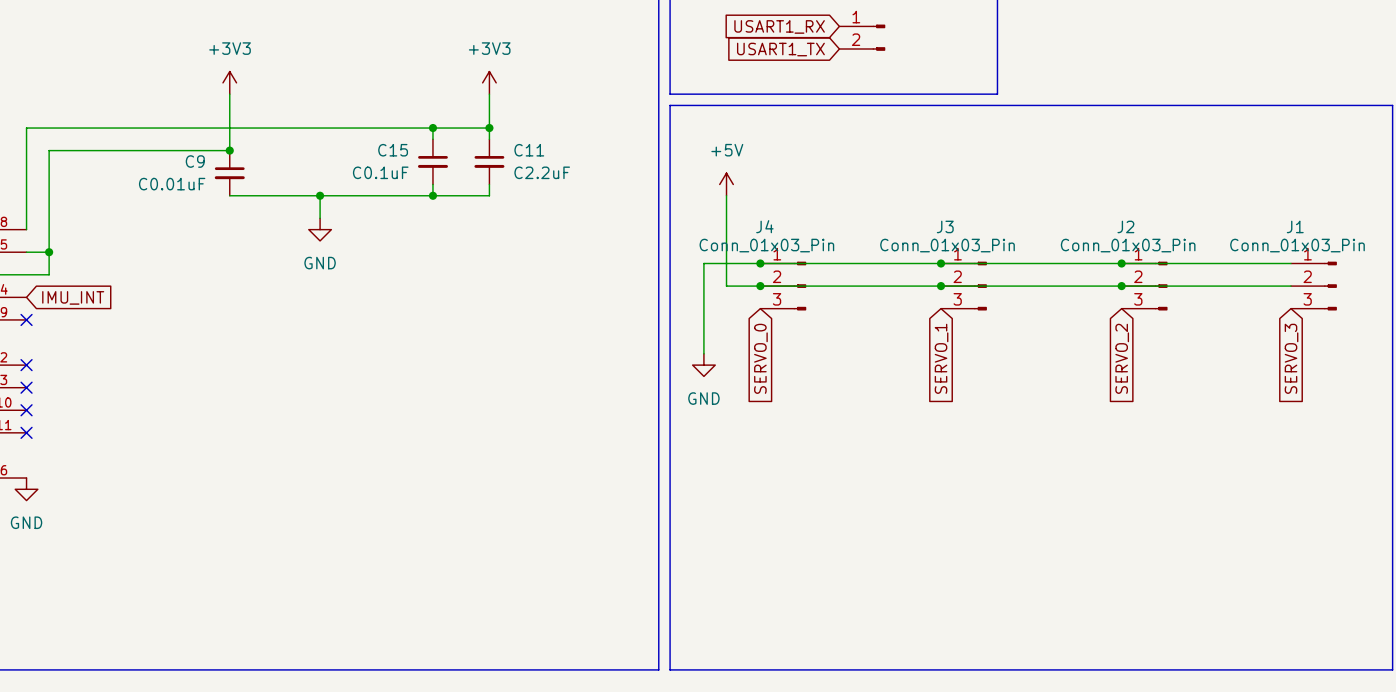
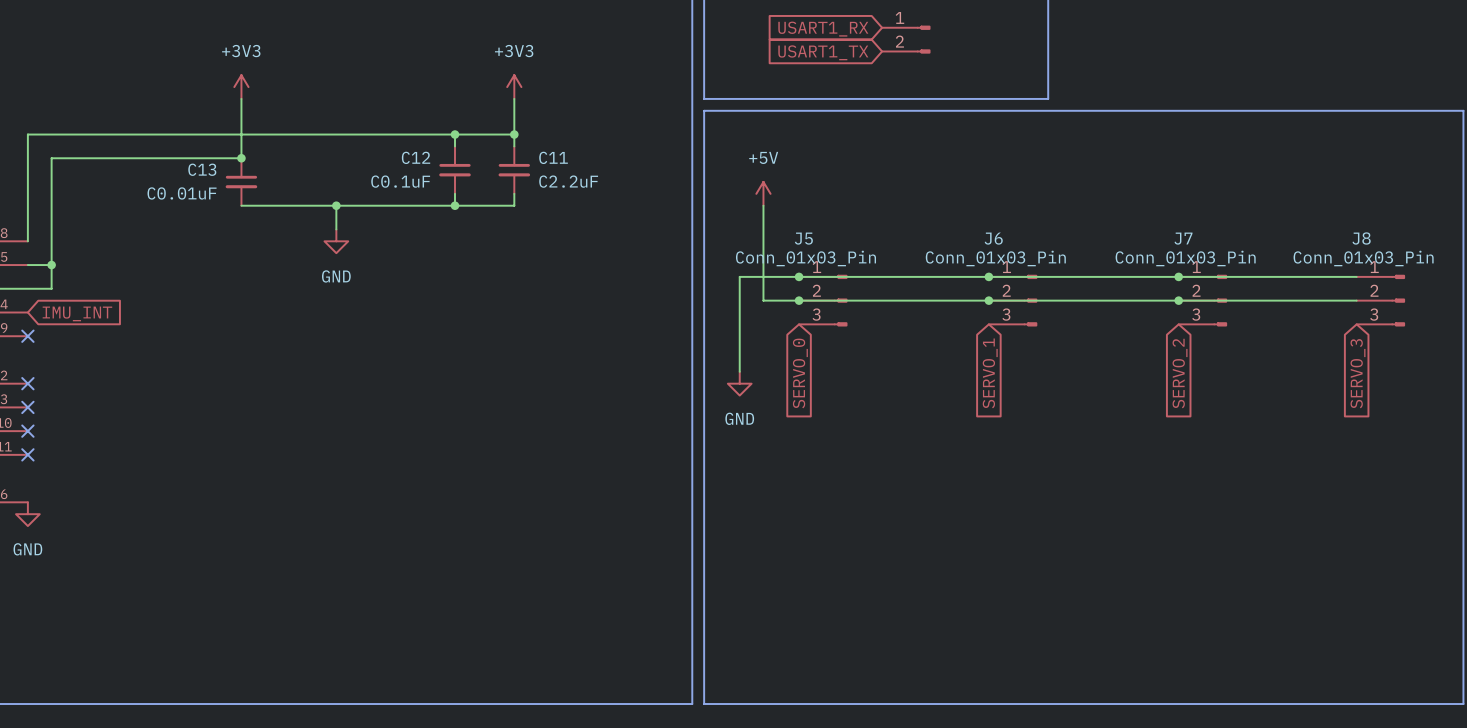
C15 name: C15 (393, 150) -> C12 (416, 157)
C9 name: C9 (195, 161) -> C13 (202, 169)
J4 name: J4 (764, 226) -> J5 (803, 238)
J3 name: J3 (945, 226) -> J6 (993, 238)
J2 name: J2 (1125, 226) -> J7 (1183, 238)
J1 name: J1 (1295, 226) -> J8 (1361, 238)

